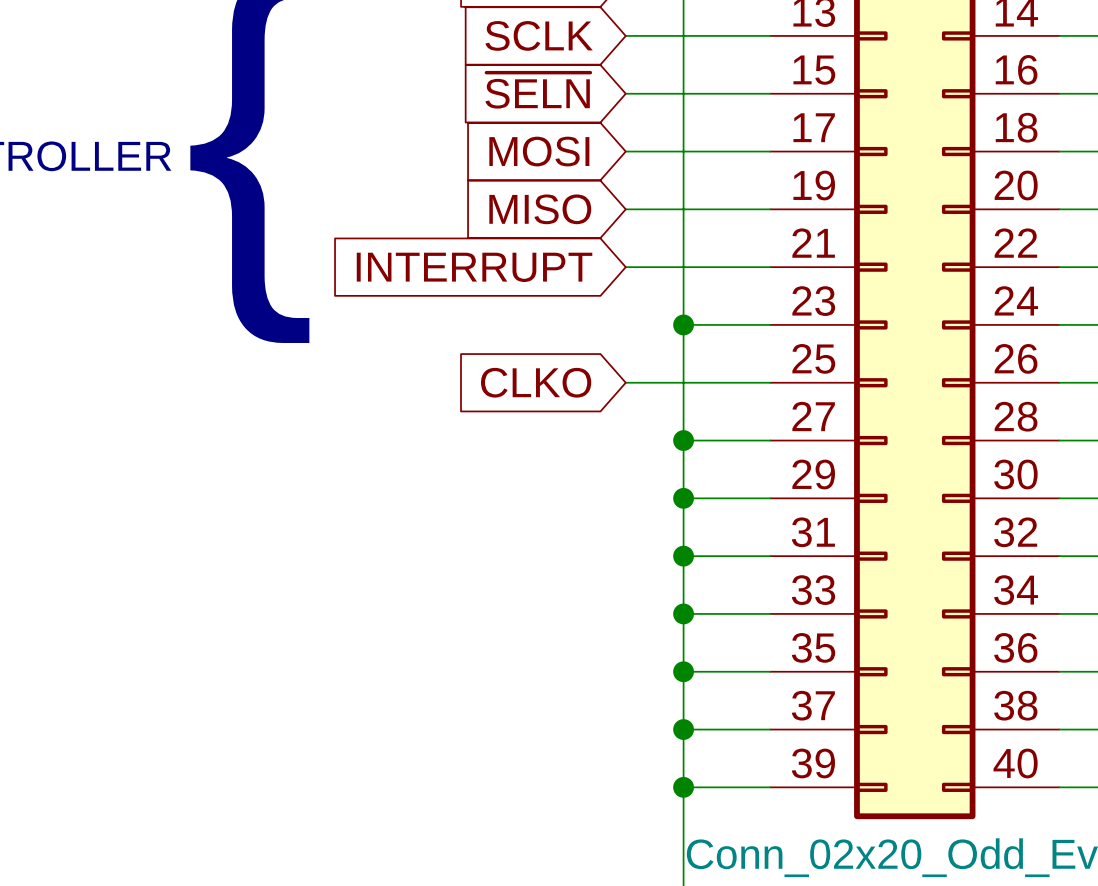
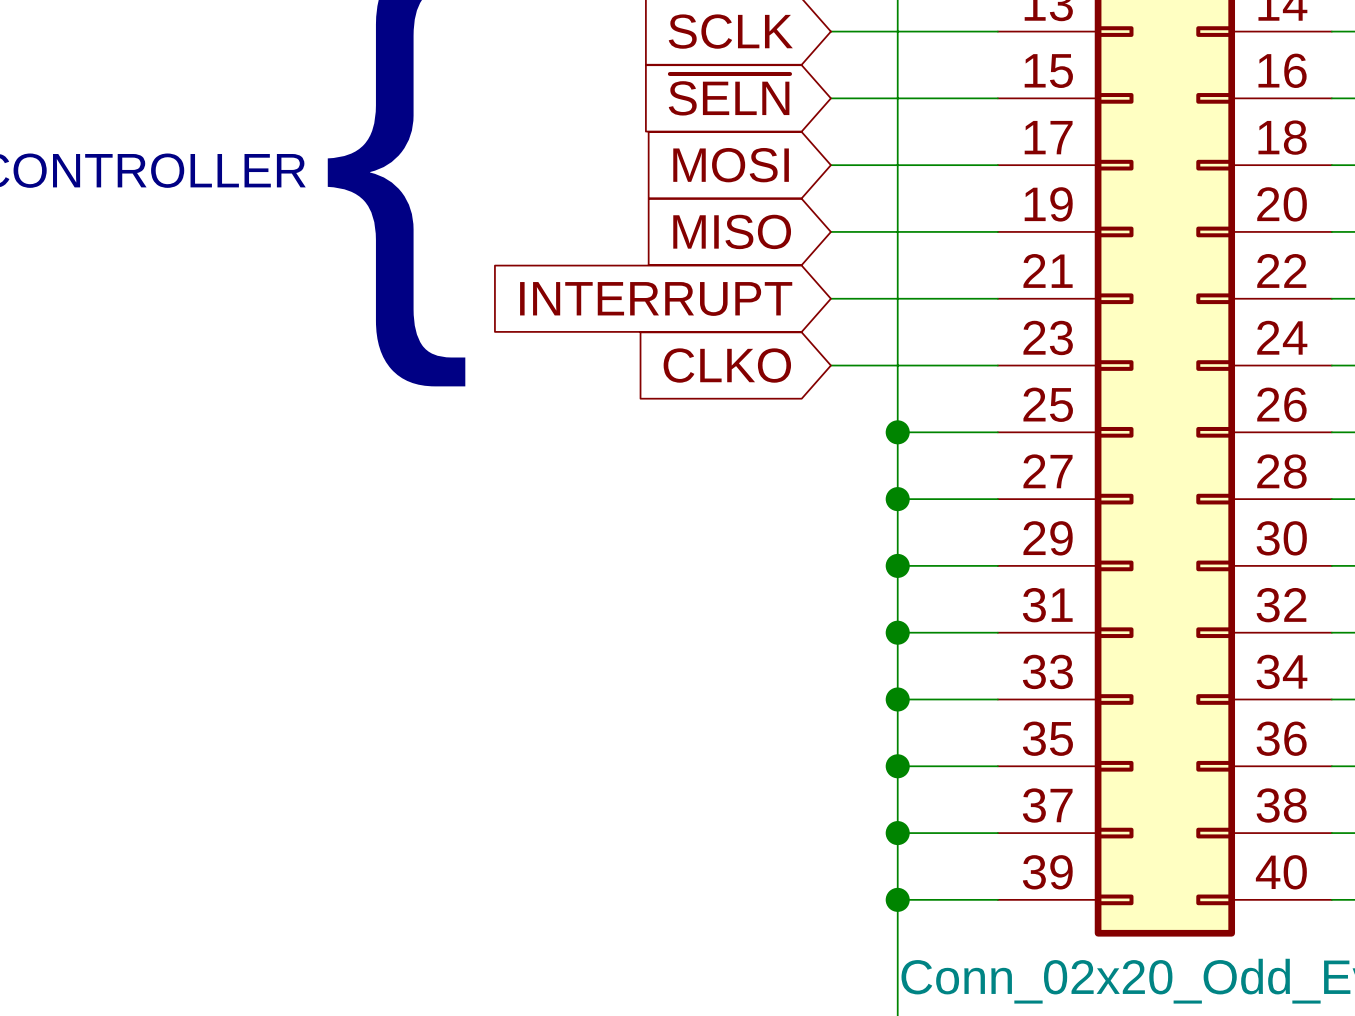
junction position: (683, 324) -> (897, 432)
global label position: CLKO (536, 382) -> CLKO (727, 365)
wire: (625, 382) (683, 382) -> (830, 365) (897, 365)

